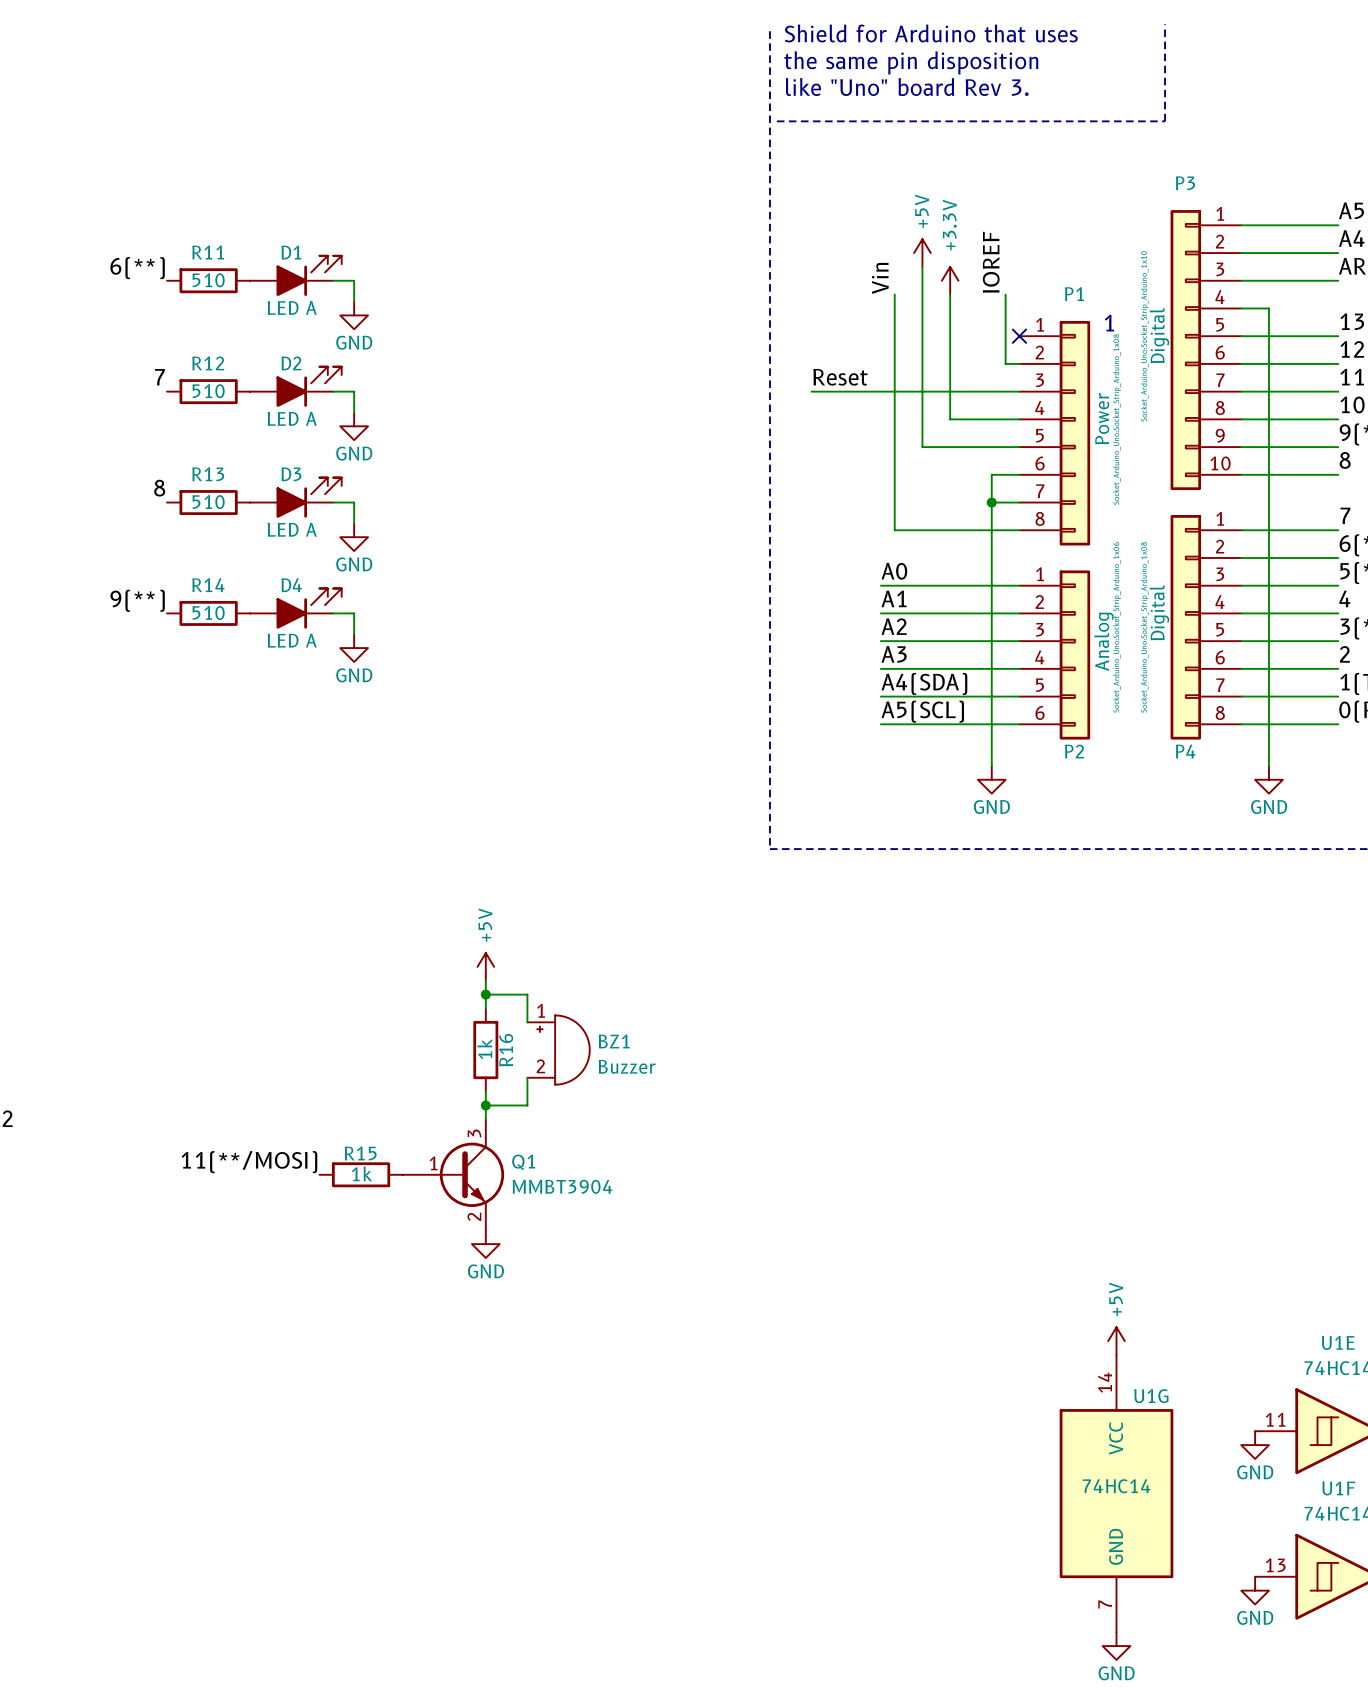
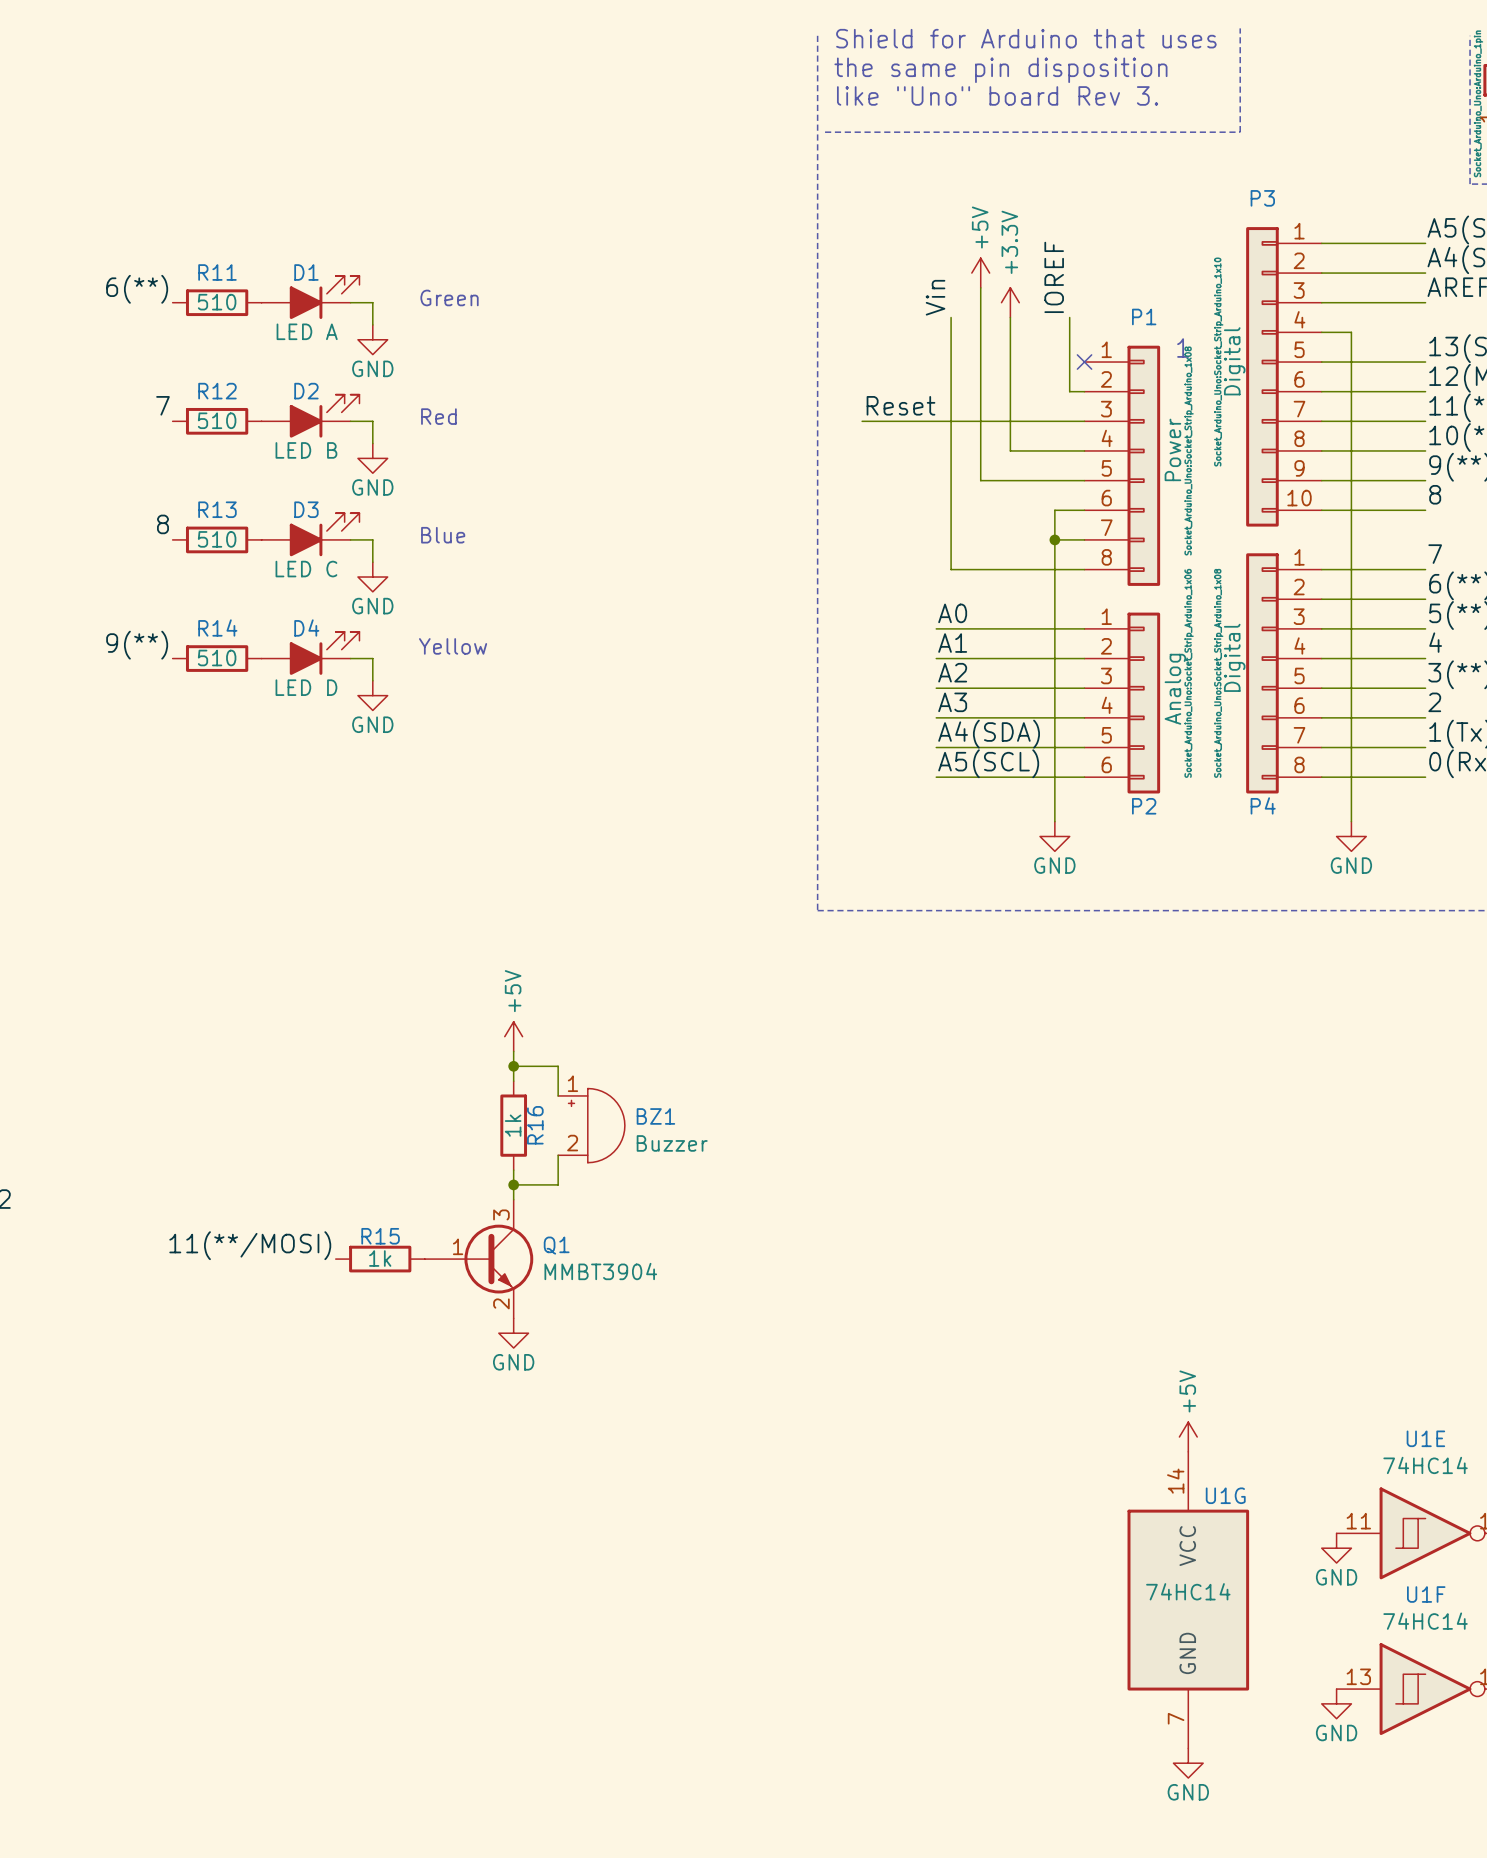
text: none -> Green (449, 297)
text: none -> Red (438, 416)
D2 value: LED A (292, 418) -> LED B (306, 450)
text: none -> Blue (443, 535)
D3 value: LED A (292, 529) -> LED C (306, 569)
text: none -> Yellow (453, 646)
D4 value: LED A (292, 640) -> LED D (306, 687)

